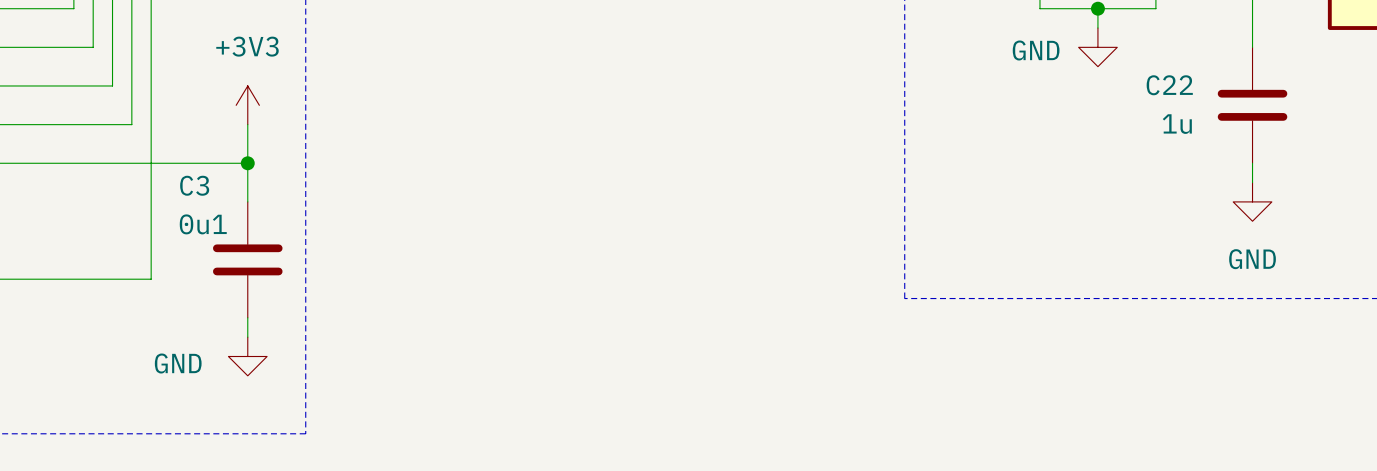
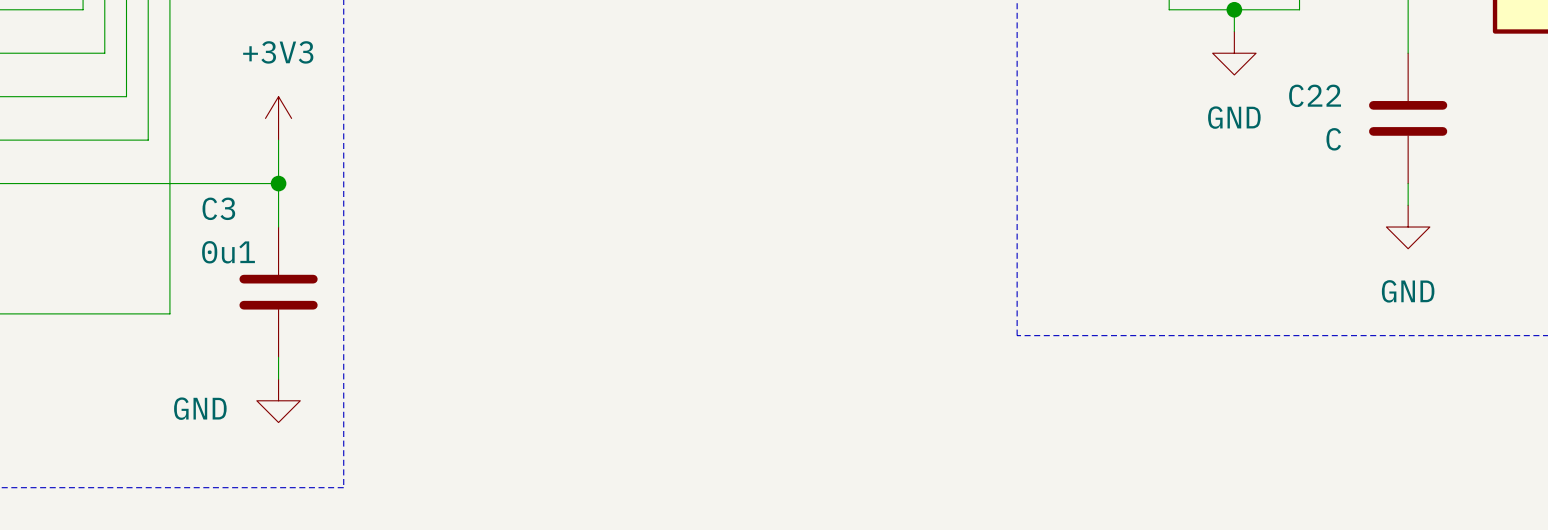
power symbol text position: GND (1036, 50) -> GND (1234, 117)
C22 value: 1u (1177, 124) -> C (1333, 139)

